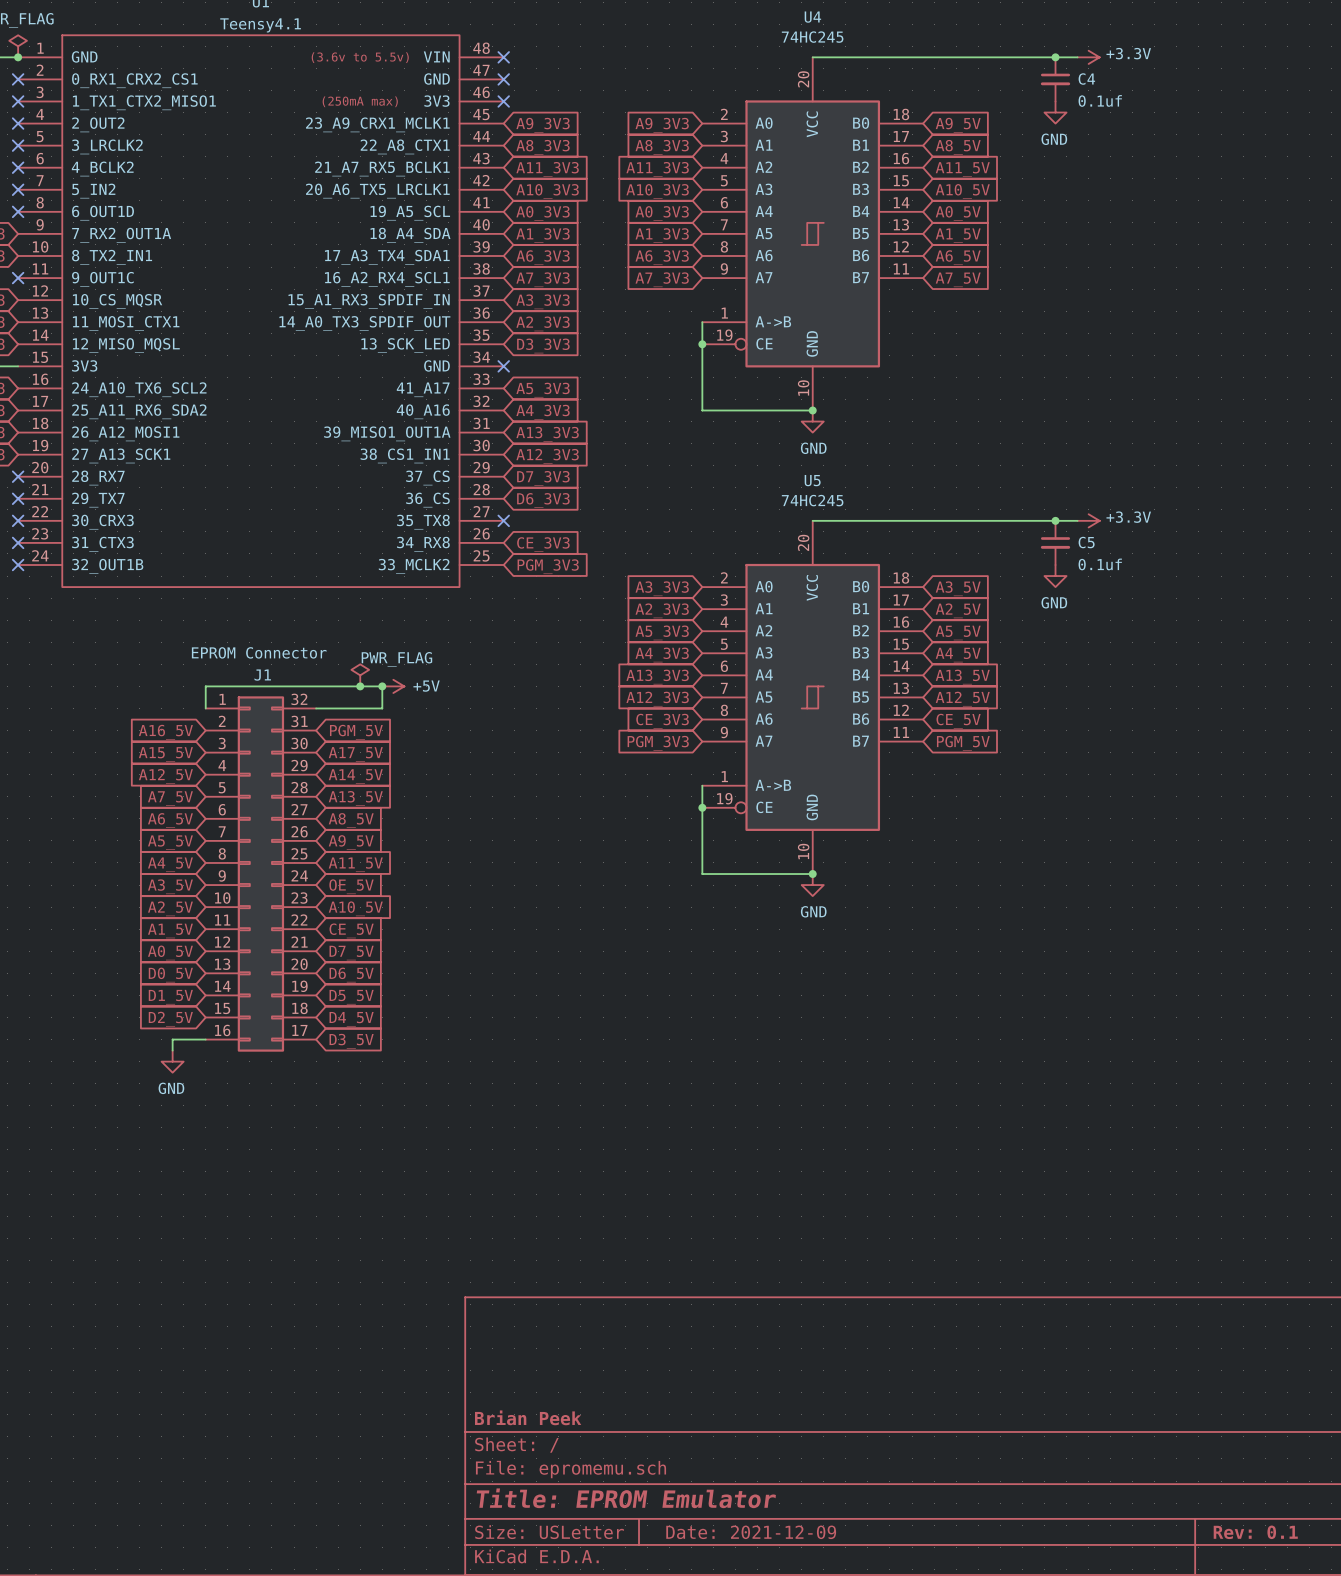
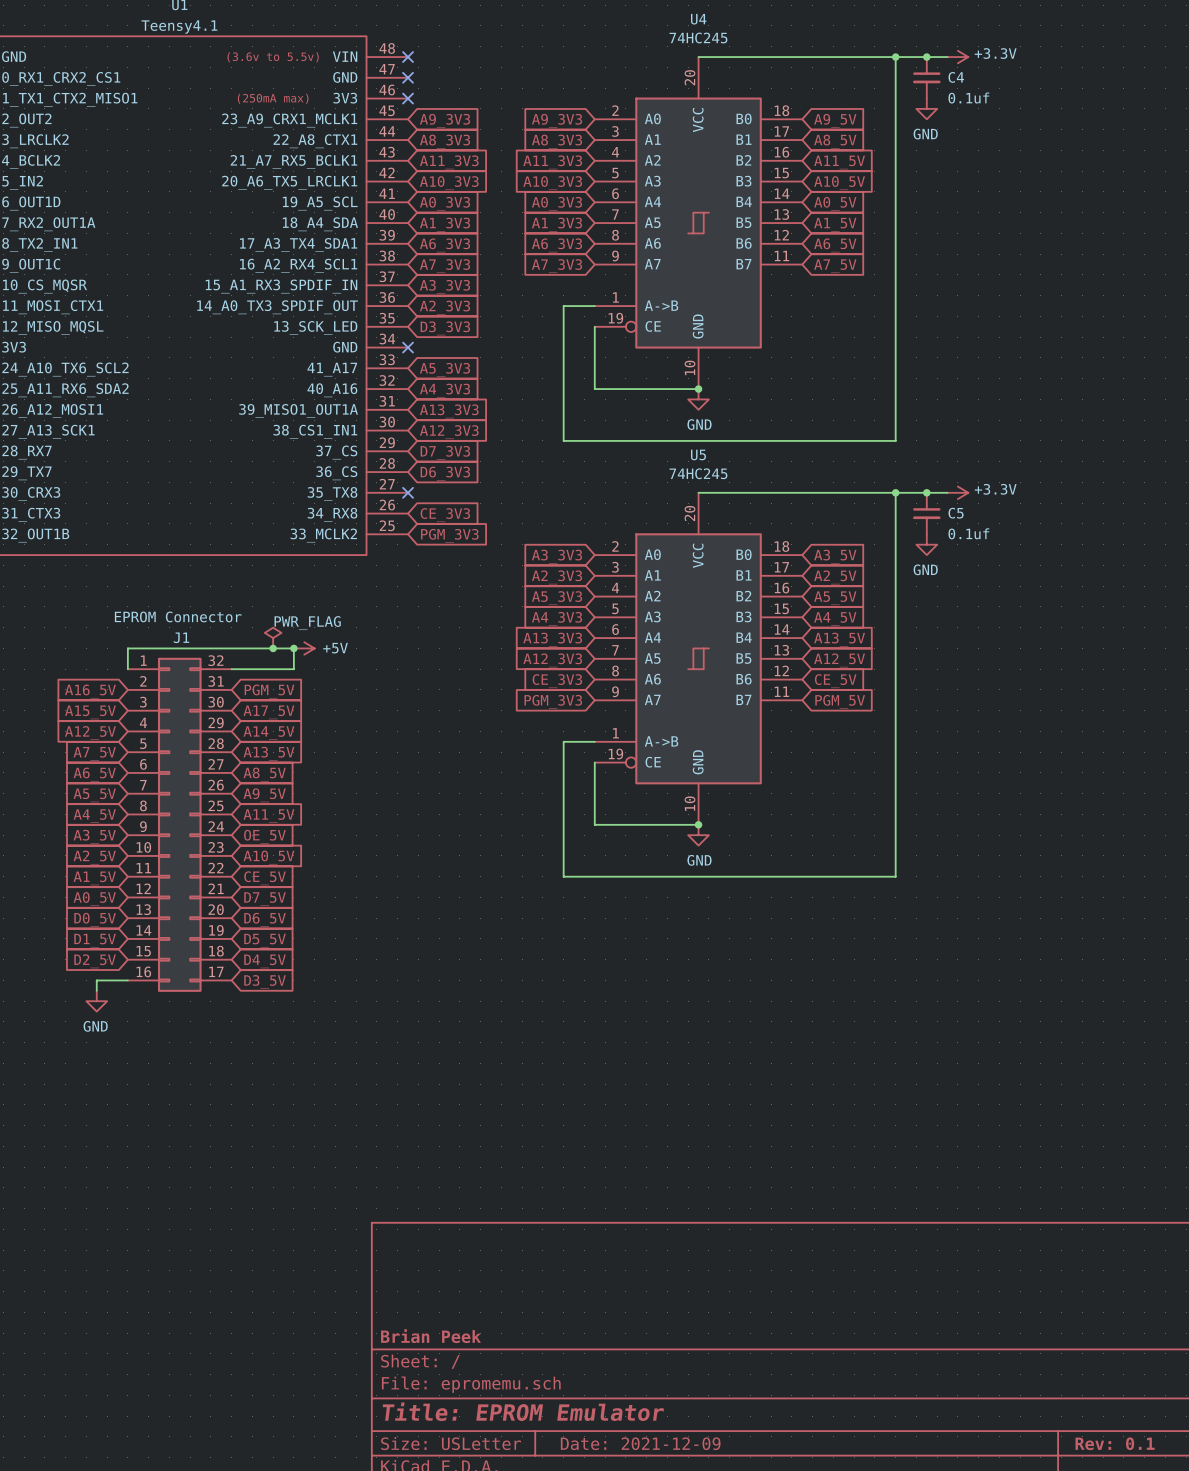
junction: none -> (895, 57)
wire: (702, 322) (702, 344) -> (594, 306) (563, 306) (563, 440) (895, 440) (895, 57)
junction: (702, 344) -> none
junction: none -> (895, 492)
wire: (702, 785) (702, 807) -> (594, 741) (563, 741) (563, 876) (895, 876) (895, 492)
junction: (702, 807) -> none

